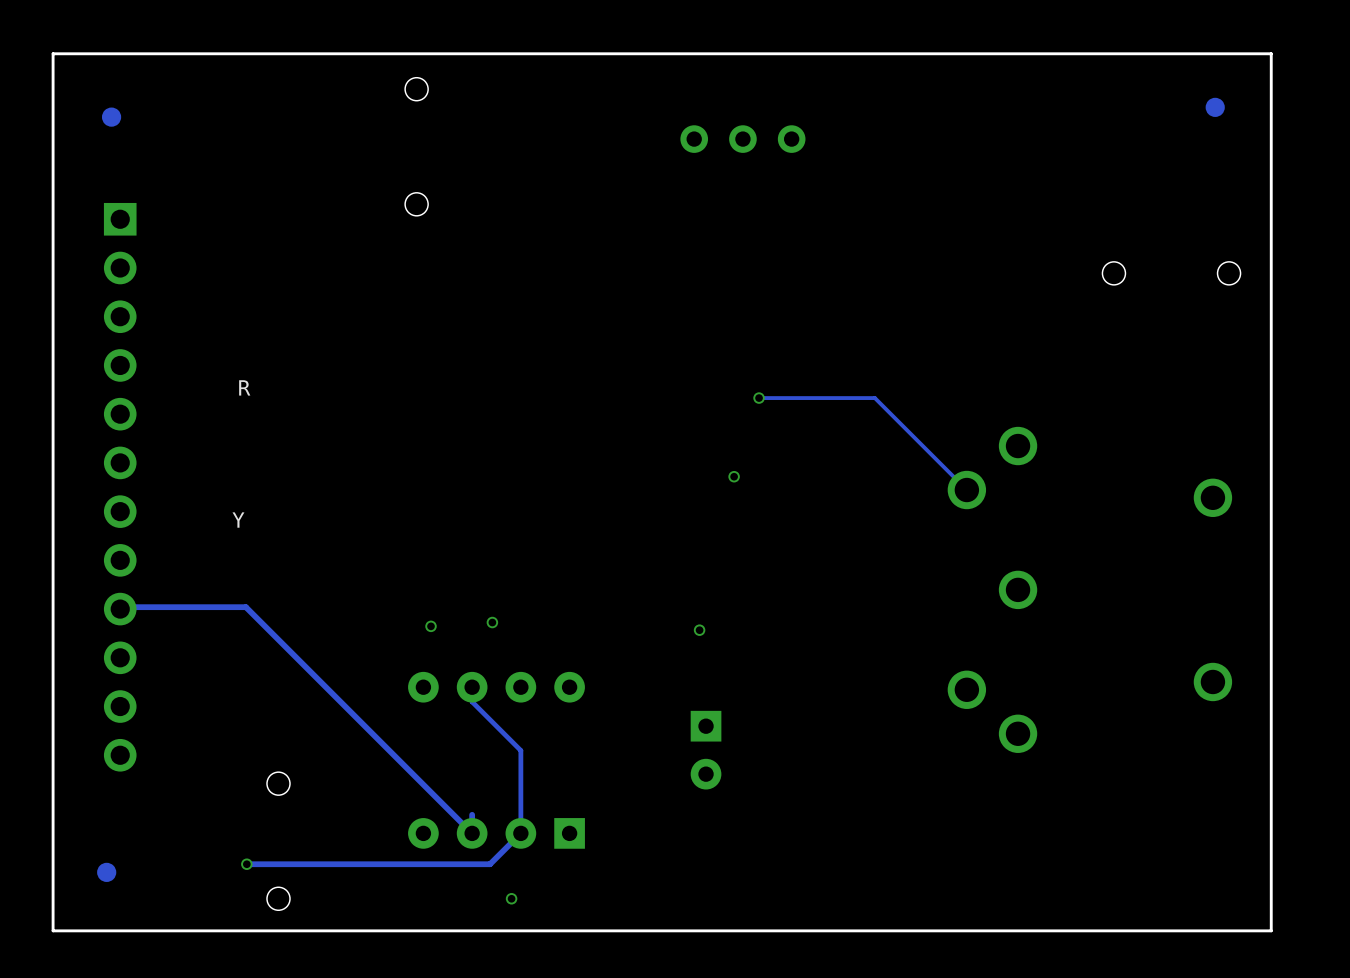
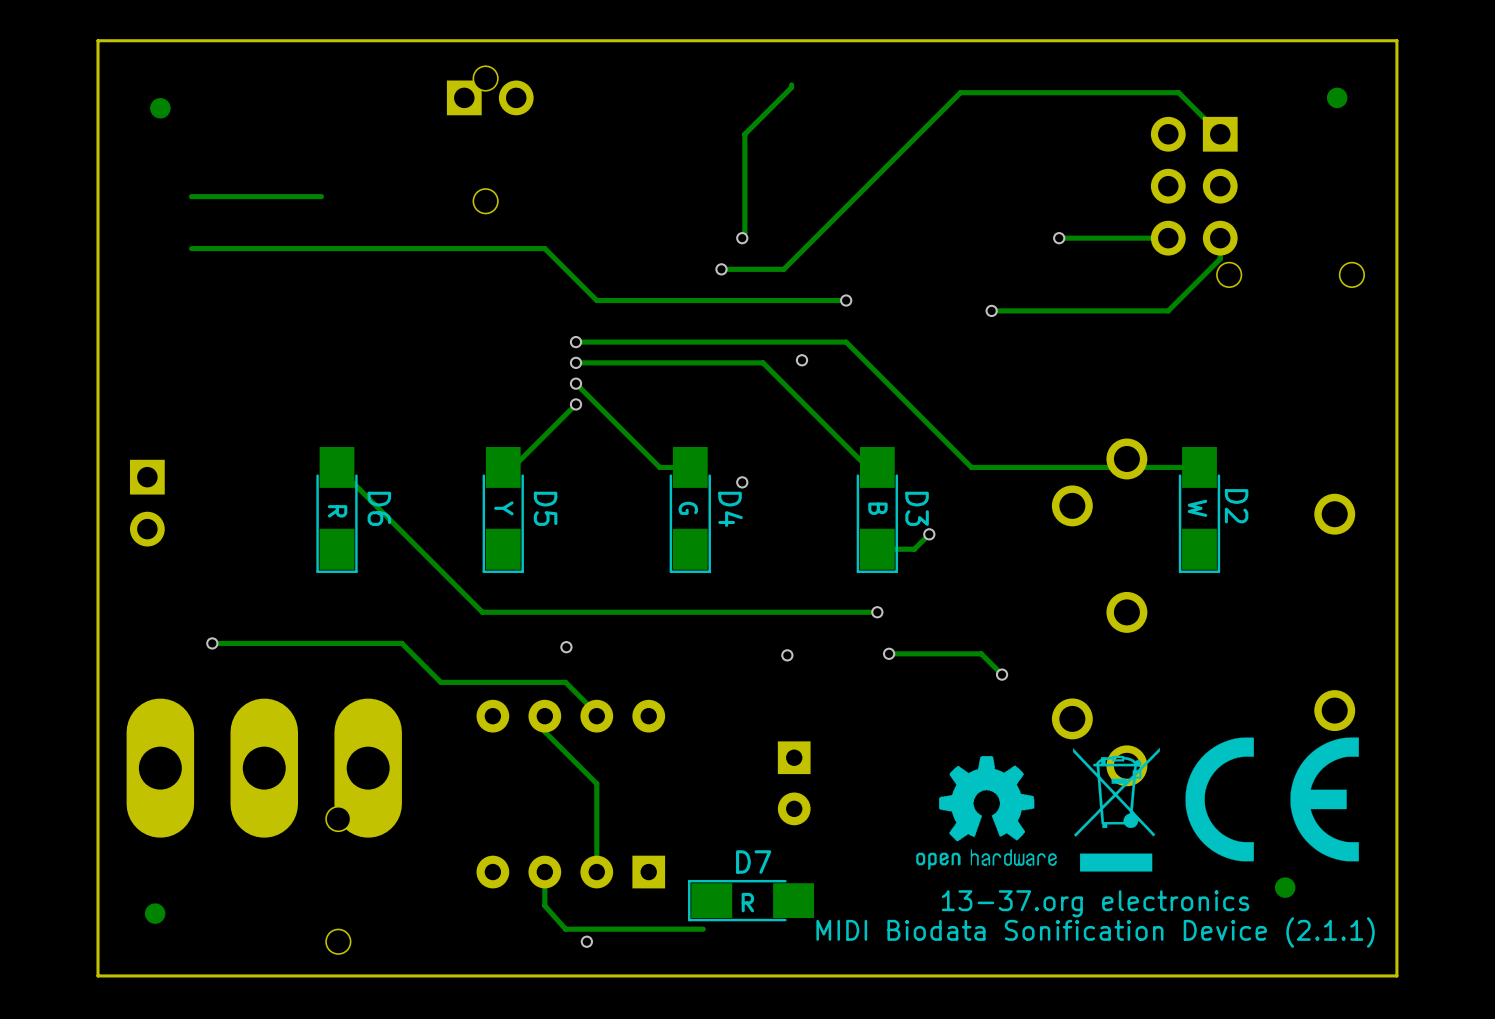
track: none -> (791, 84) (791, 87) (744, 134) (744, 232) (742, 238)
part: none -> (490, 97)
part: (742, 139) -> none
track: none -> (1220, 134) (1178, 92) (960, 92) (783, 269) (721, 269)
part: none -> (1194, 186)
track: none -> (321, 196) (191, 196)
via: none -> (742, 238)
via: none -> (1059, 238)
track: none -> (1168, 238) (1059, 238)
track: none -> (1220, 238) (1220, 258) (1168, 310) (991, 310)
track: none -> (191, 248) (544, 248) (596, 300) (846, 300)
via: none -> (721, 269)
via: none -> (846, 300)
via: none -> (991, 310)
track: none -> (576, 342) (846, 342) (971, 467) (1199, 467)
via: none -> (576, 342)
via: none -> (802, 360)
track: none -> (576, 362) (763, 362) (867, 467) (877, 467) (877, 456)
via: none -> (576, 362)
track: none -> (576, 383) (659, 467) (690, 467) (690, 456)
via: none -> (576, 383)
text rotation: 0° (244, 387) -> 90° clockwise (337, 511)
text position: R (244, 387) -> R (337, 511)
track: none -> (576, 404) (513, 467) (503, 467)
via: none -> (576, 404)
track: (759, 398) (874, 398) (966, 490) -> none
via: (759, 398) -> none
track: none -> (337, 467) (482, 612) (877, 612)
via: none -> (742, 482)
via: (734, 476) -> none
part: none -> (147, 503)
part: (120, 487) -> none
text: none -> G (688, 508)
text: none -> B (877, 508)
text: none -> W (1197, 508)
D6: none -> (337, 509)
D5: none -> (503, 509)
D4: none -> (690, 509)
D3: none -> (877, 509)
D2: none -> (1199, 509)
track: none -> (929, 534) (914, 549) (877, 549)
via: none -> (929, 534)
text rotation: 0° (238, 520) -> 90° clockwise (503, 508)
text position: Y (238, 520) -> Y (503, 508)
via: none -> (877, 612)
track: (120, 609) (122, 607) (245, 607) (472, 833) (472, 814) -> none
track: none -> (212, 643) (401, 643) (440, 682) (565, 682) (596, 713) (596, 716)
via: none -> (212, 643)
via: (431, 626) -> none
track: none -> (887, 653) (981, 653) (1002, 674)
via: none -> (889, 653)
via: none -> (1002, 674)
drawing: none -> [1185, 737, 1359, 862]
drawing: none -> [916, 747, 1160, 872]
part: none -> (264, 768)
track: none -> (544, 872) (544, 905) (565, 929) (703, 929)
track: (520, 833) (490, 864) (246, 864) -> none
part: none -> (1285, 887)
D7: none -> (751, 900)
text: none -> R (747, 902)
text: none -> 13-37.org electronics (1095, 903)
via: (246, 864) -> none
text: none -> MIDI Biodata Sonification Device (2.1.1) (1095, 932)

